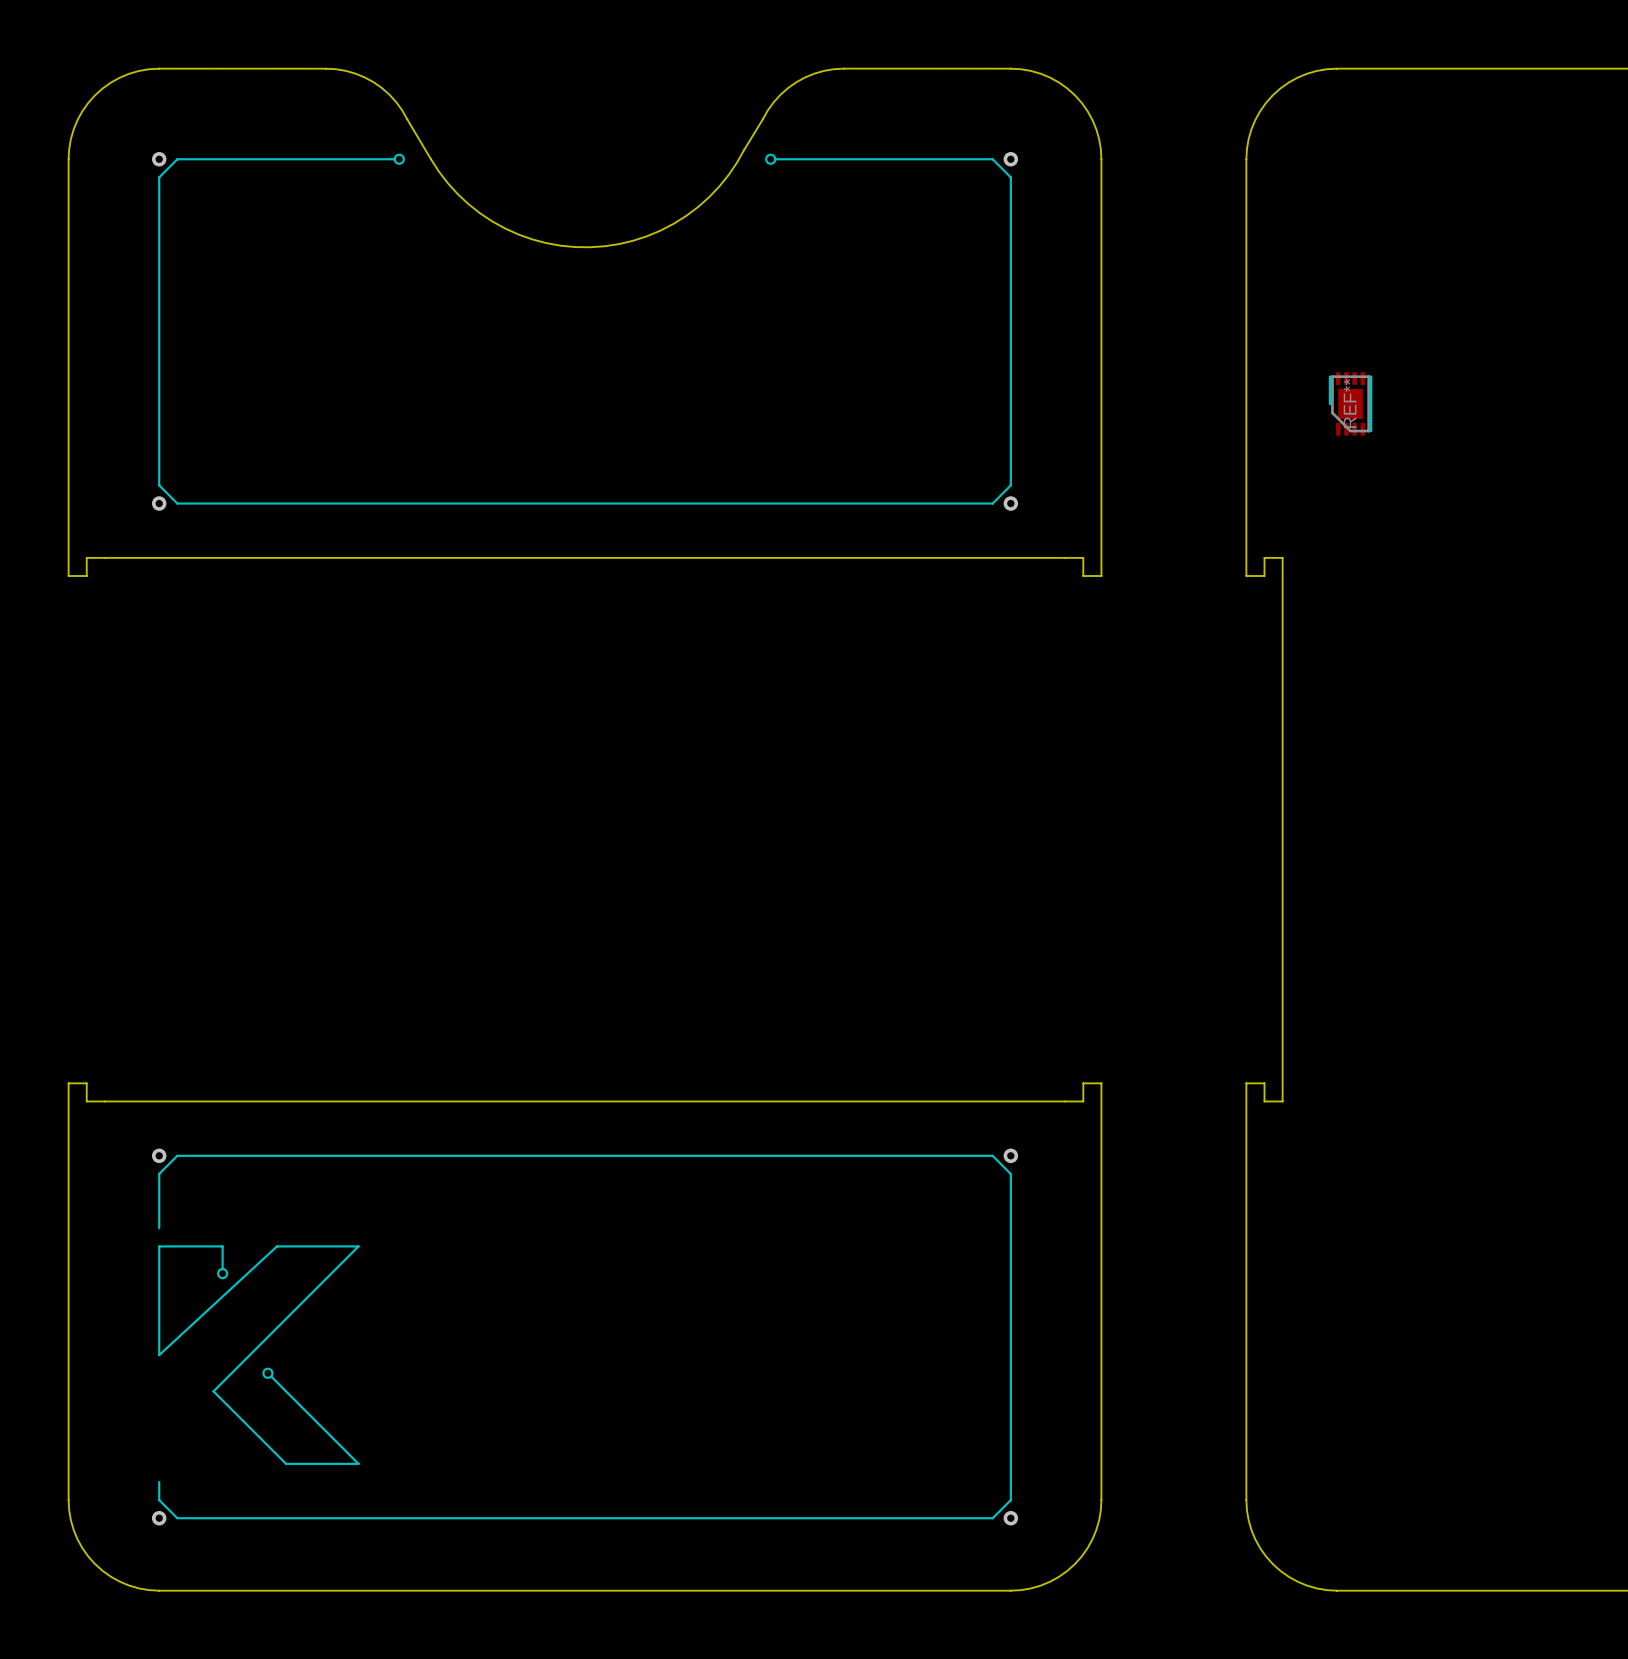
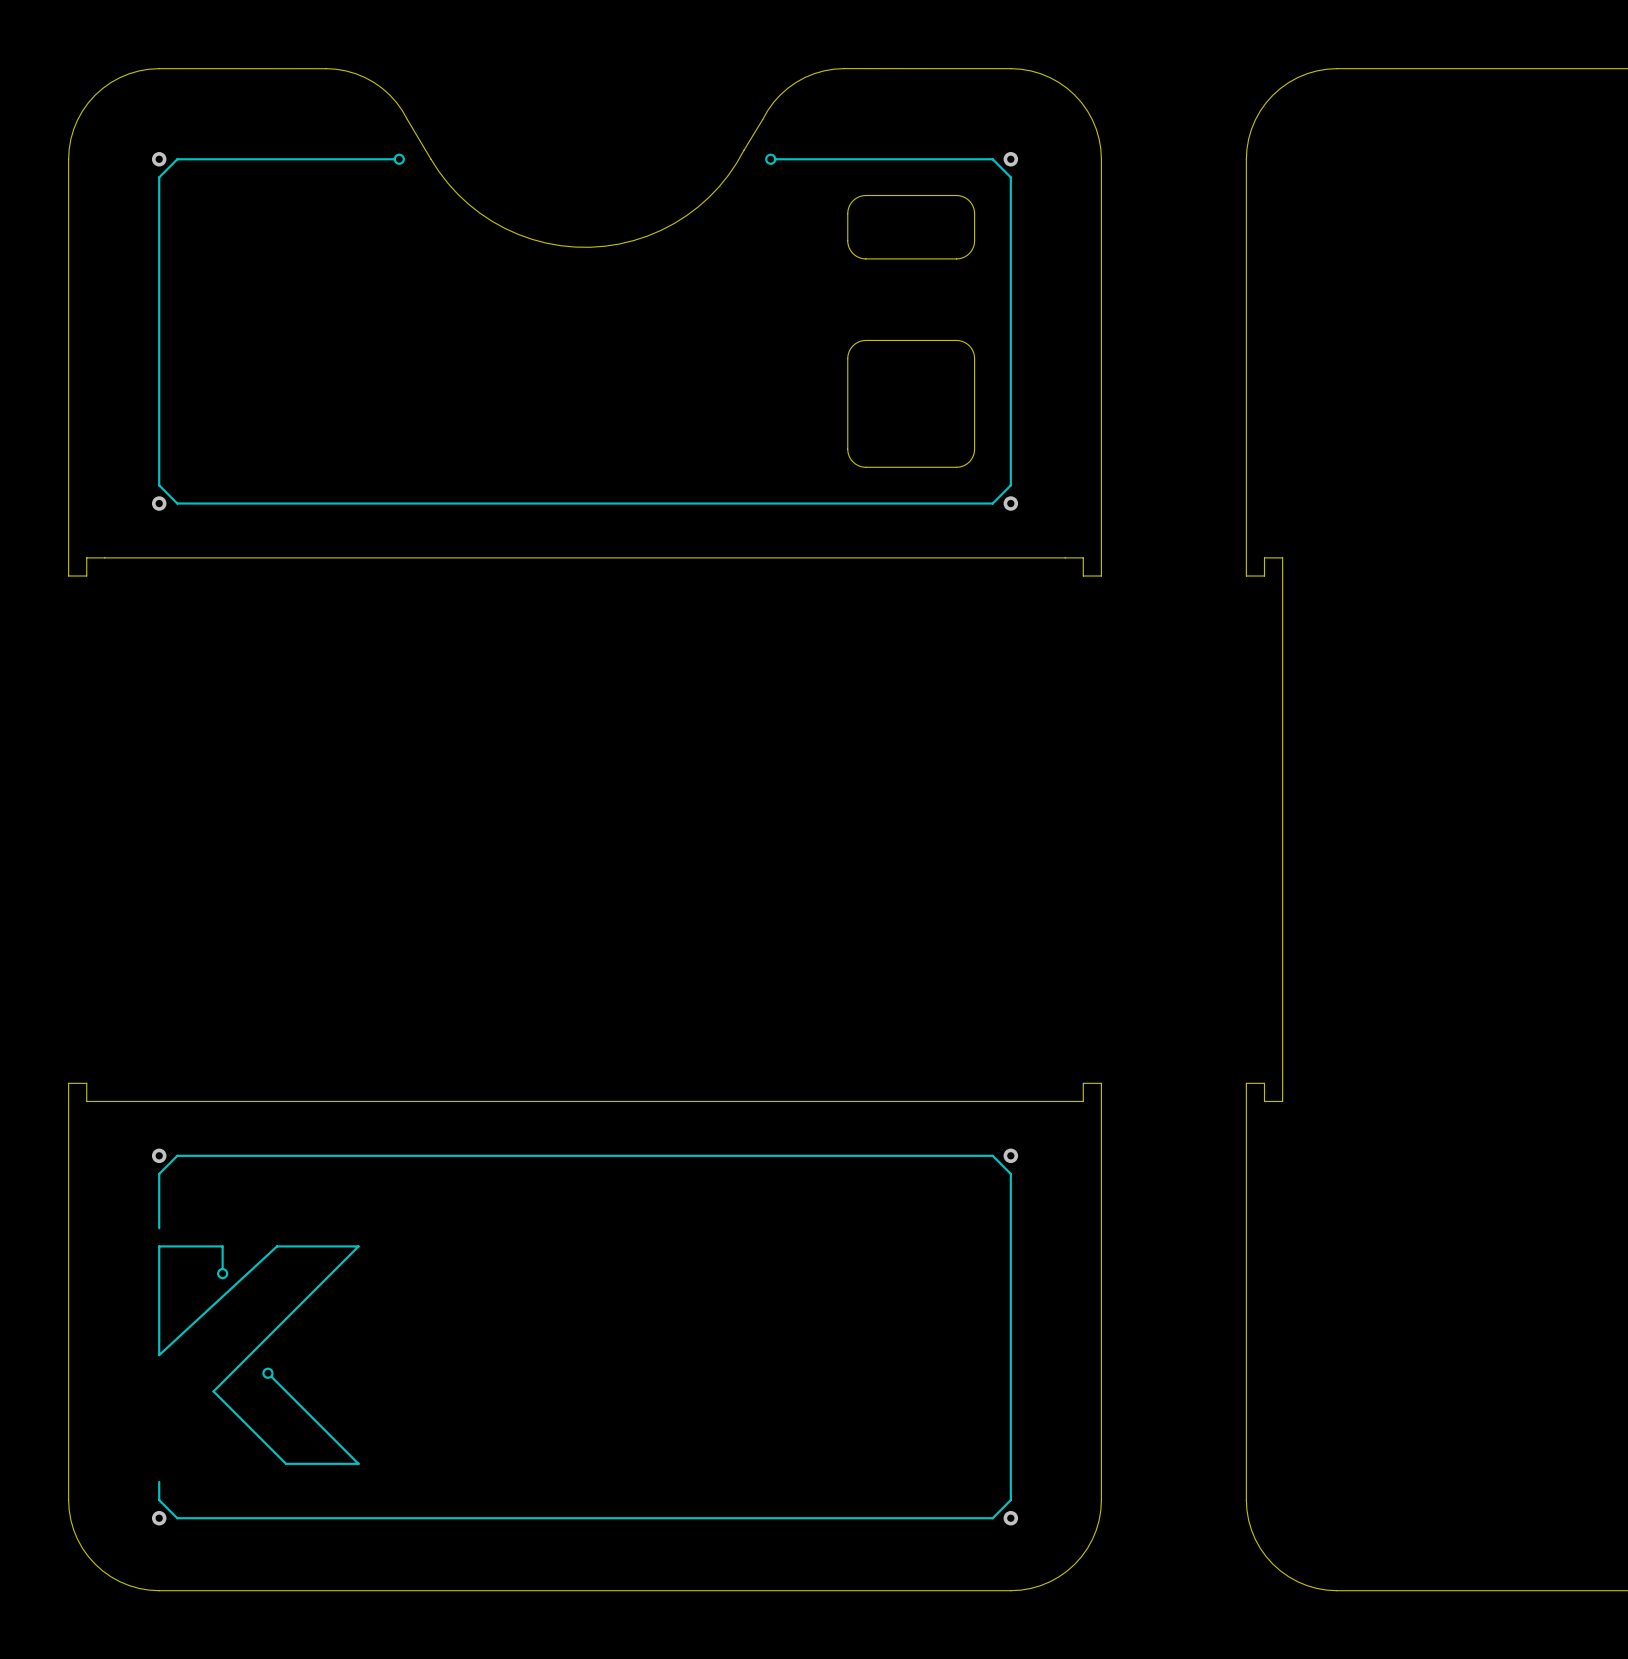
board edge: none -> (865, 195) (956, 195) (965, 197) (970, 202) (974, 211) (974, 240) (972, 249) (965, 256) (956, 258) (865, 258) (856, 256) (851, 251) (847, 243) (847, 211) (853, 200) (865, 195)
board edge: none -> (865, 340) (958, 340) (970, 347) (974, 358) (974, 449) (972, 458) (967, 463) (956, 467) (865, 467) (858, 465) (851, 460) (847, 449) (847, 356) (853, 345) (865, 340)
REF**: (1350, 403) -> none

